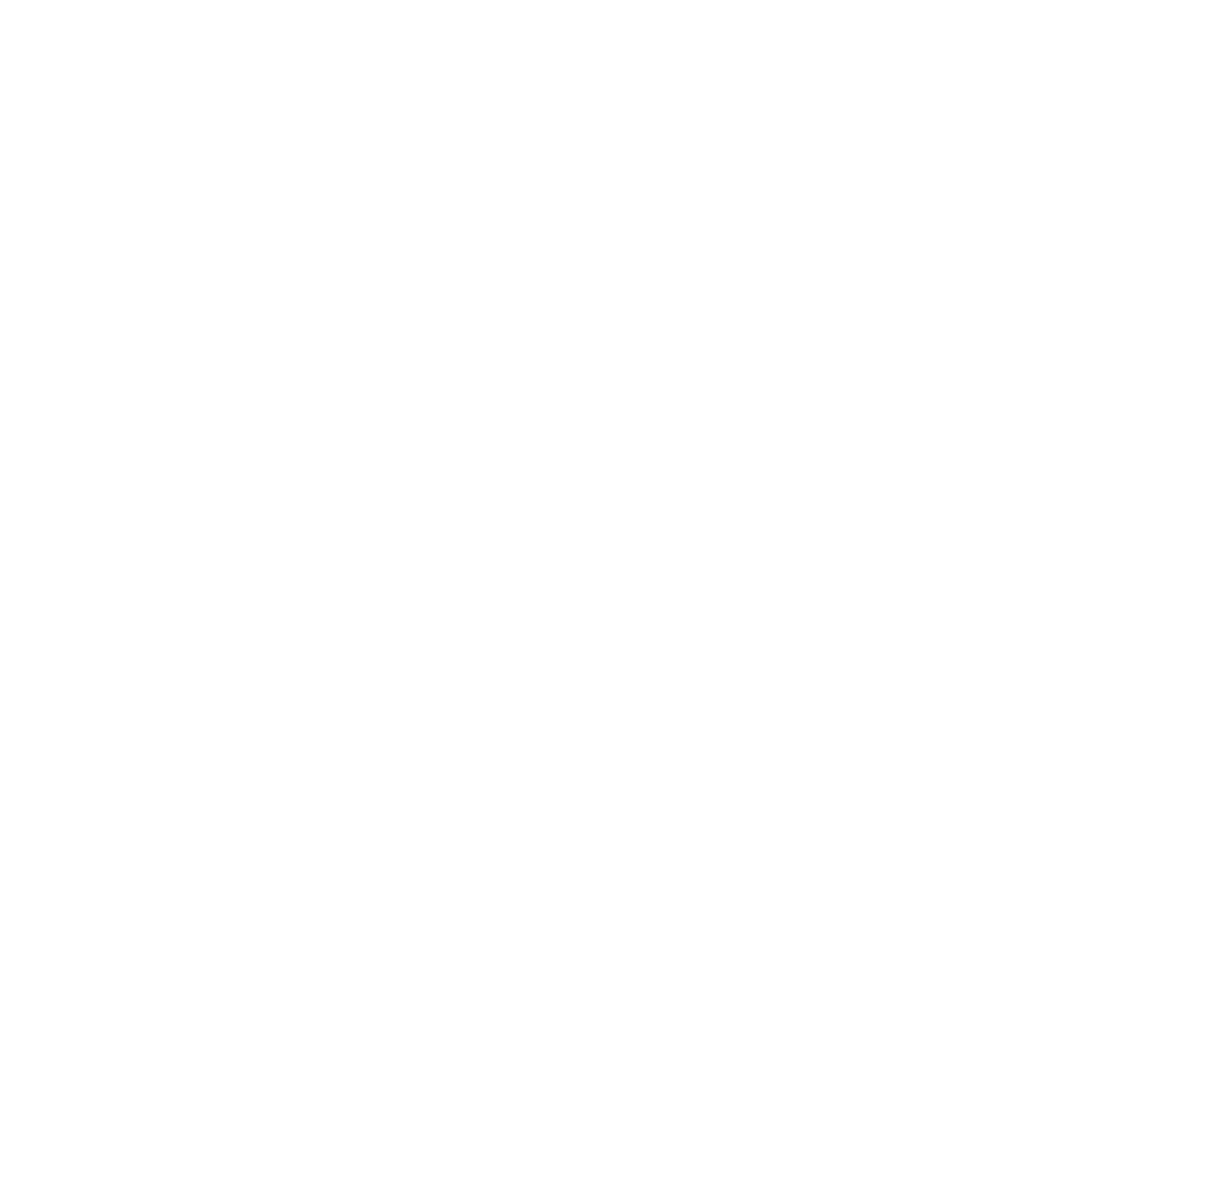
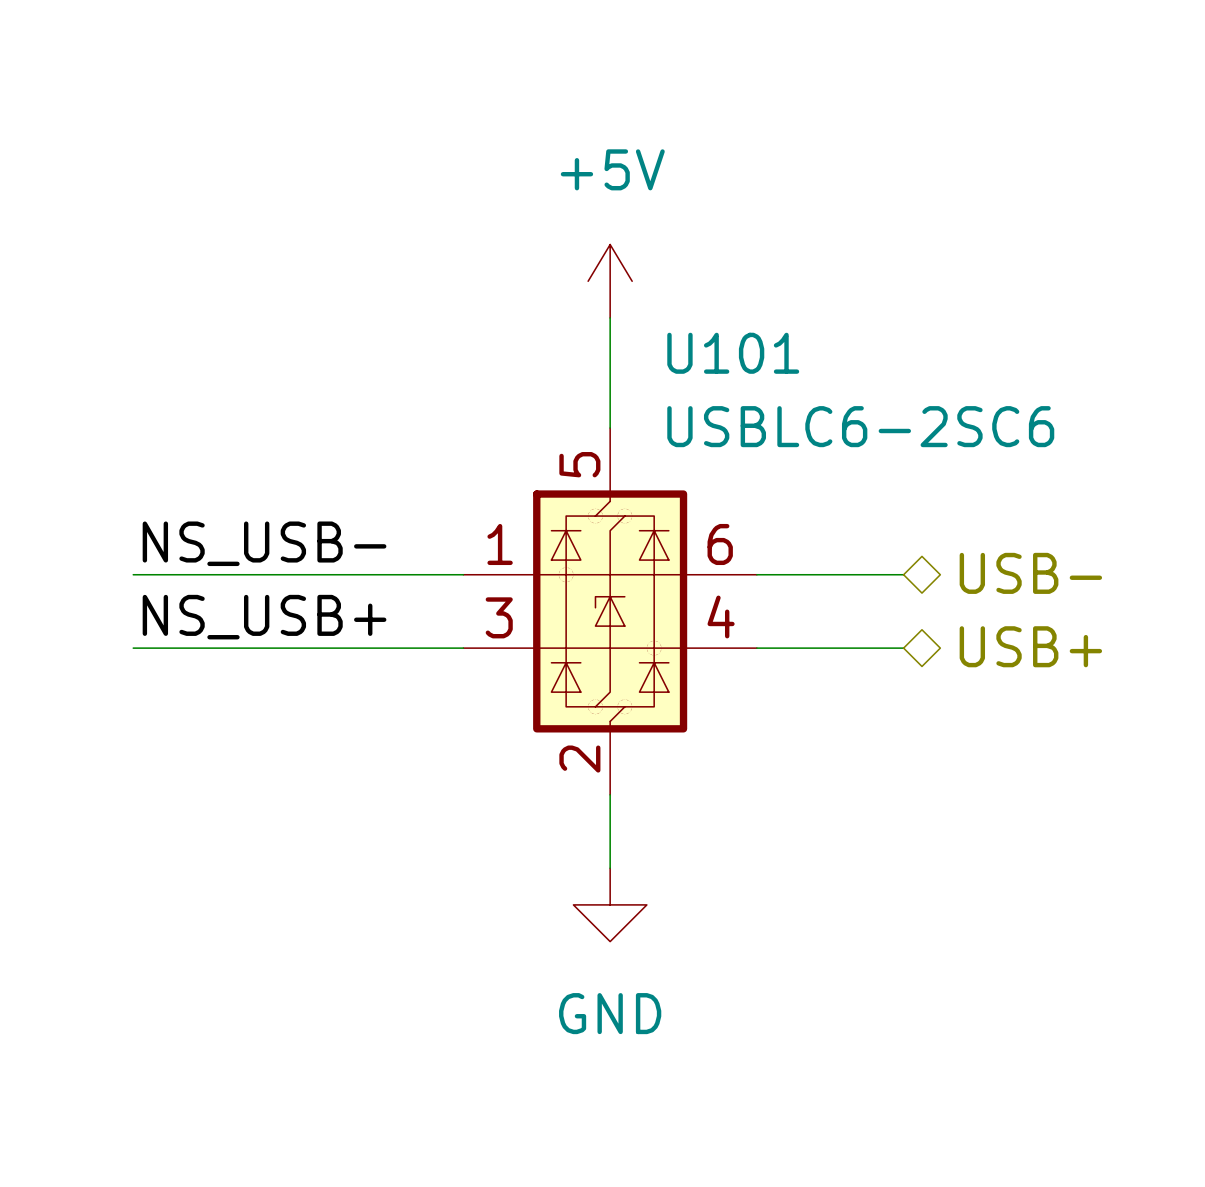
power symbol: none -> +5V (610, 281)
wire: none -> (610, 317) (610, 428)
label: none -> NS_USB- (264, 543)
hierarchical label: none -> USB- (1030, 573)
wire: none -> (133, 574) (463, 574)
wire: none -> (756, 574) (903, 574)
U101: none -> USBLC6-2SC6 (610, 611)
label: none -> NS_USB+ (264, 617)
hierarchical label: none -> USB+ (1030, 646)
wire: none -> (133, 648) (463, 648)
wire: none -> (756, 648) (903, 648)
wire: none -> (610, 794) (610, 868)
power symbol: none -> GND (610, 904)

